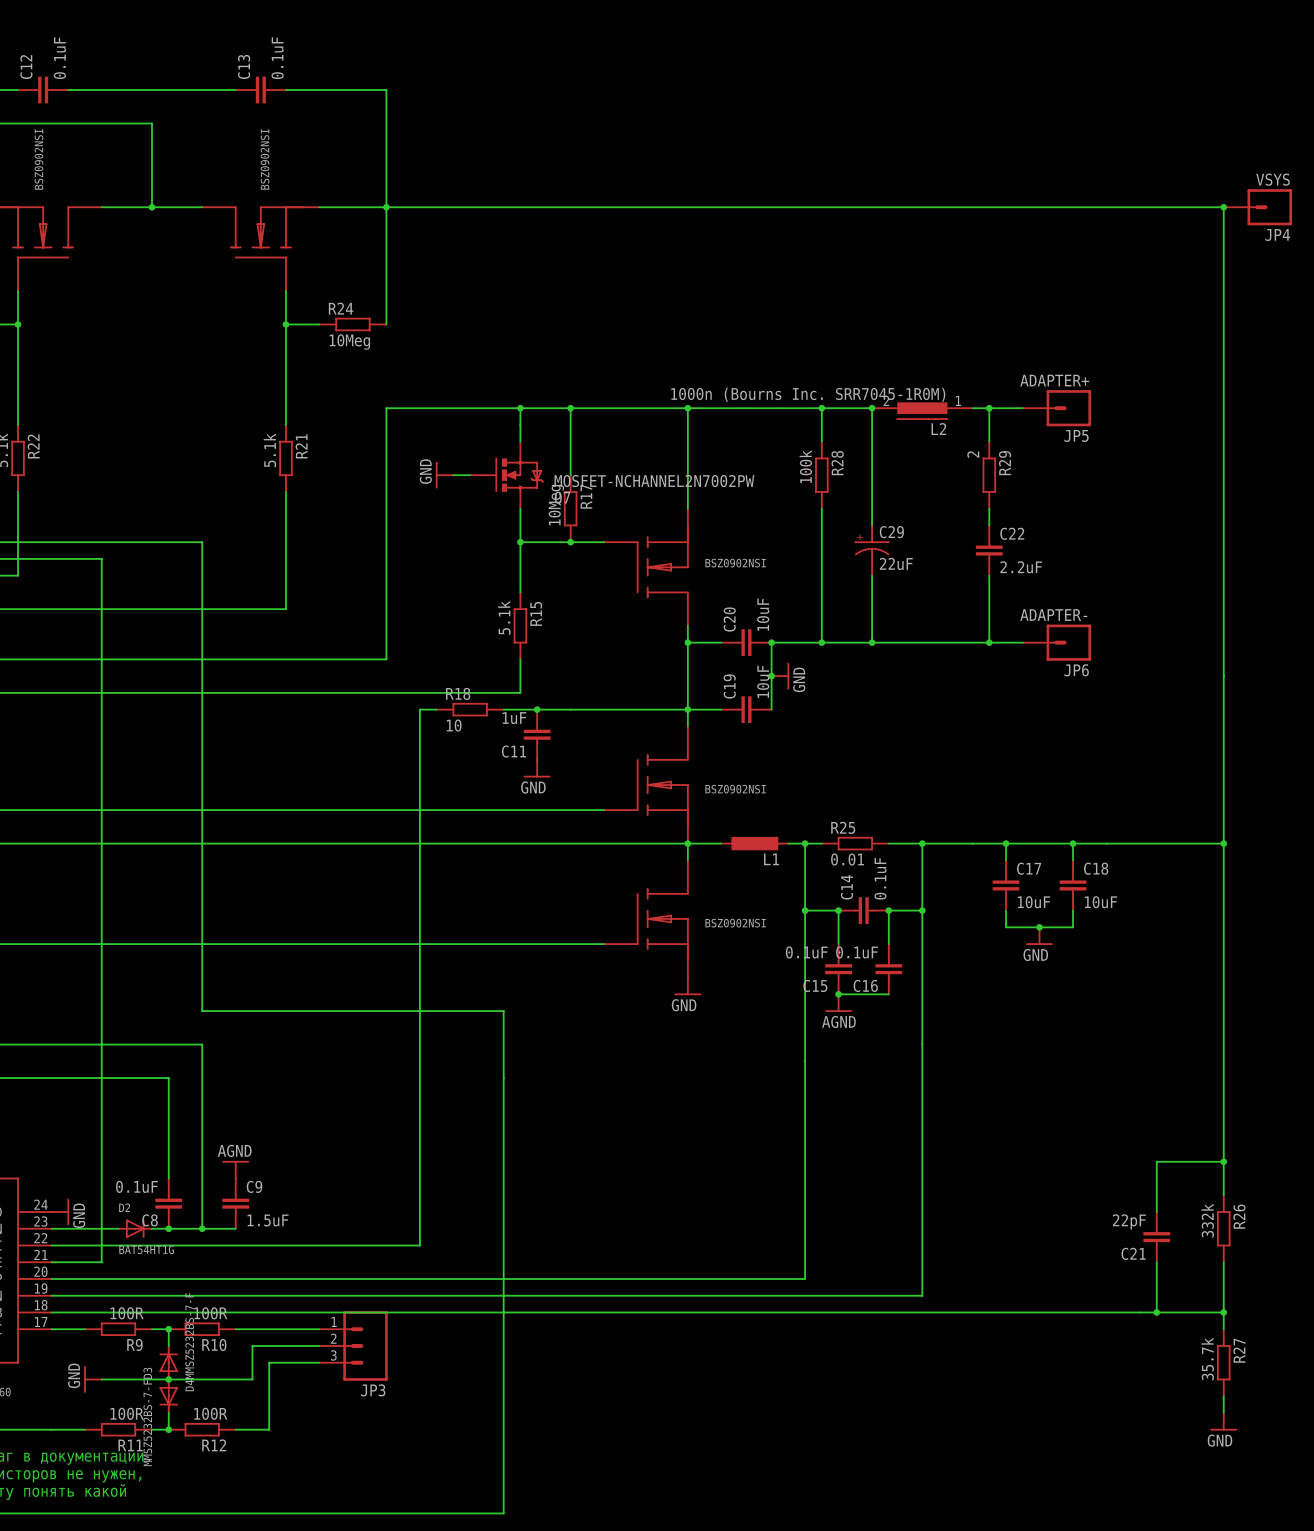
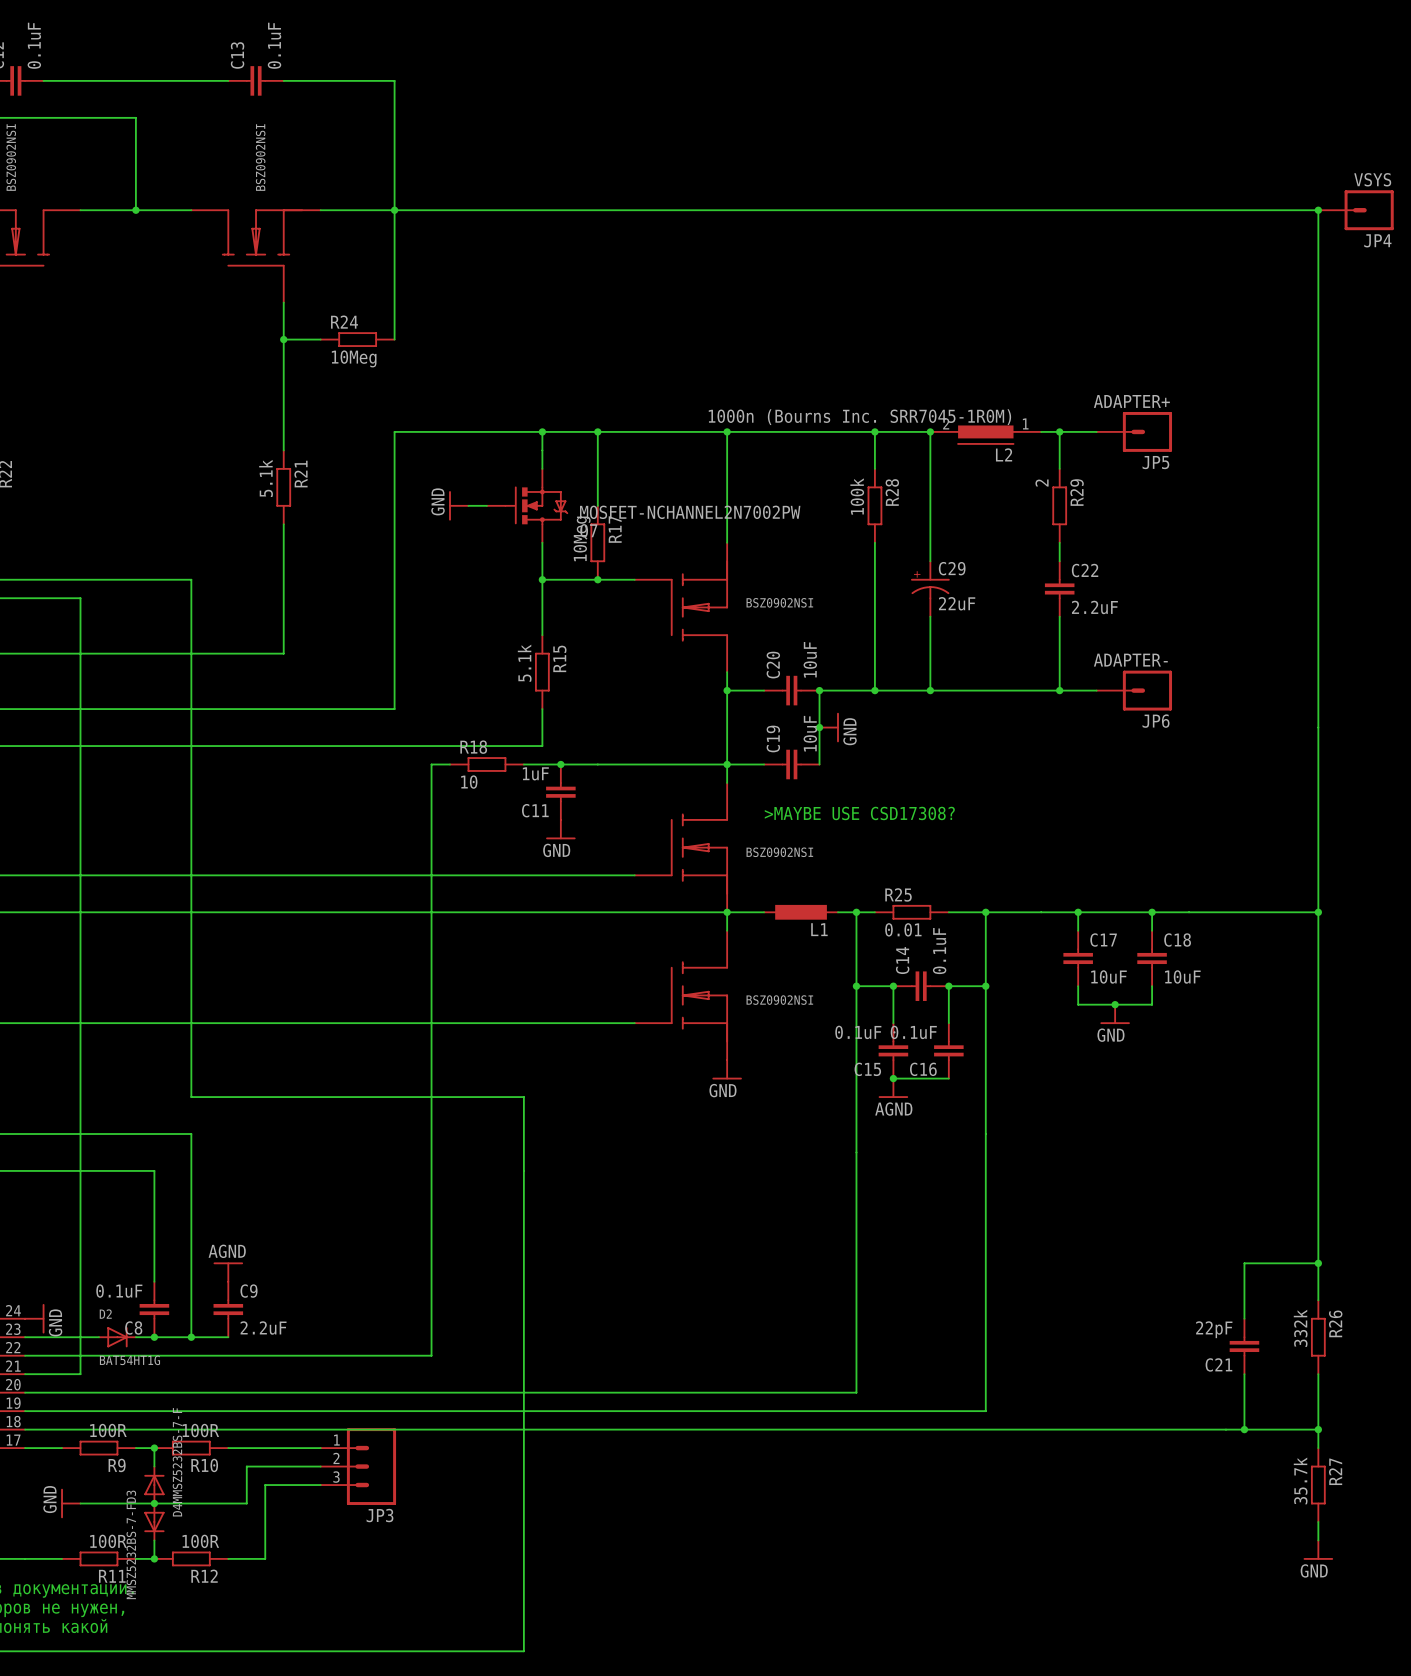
text: none -> >MAYBE USE CSD17308? (859, 813)
C9 value: 1.5uF (267, 1220) -> 2.2uF (263, 1328)

